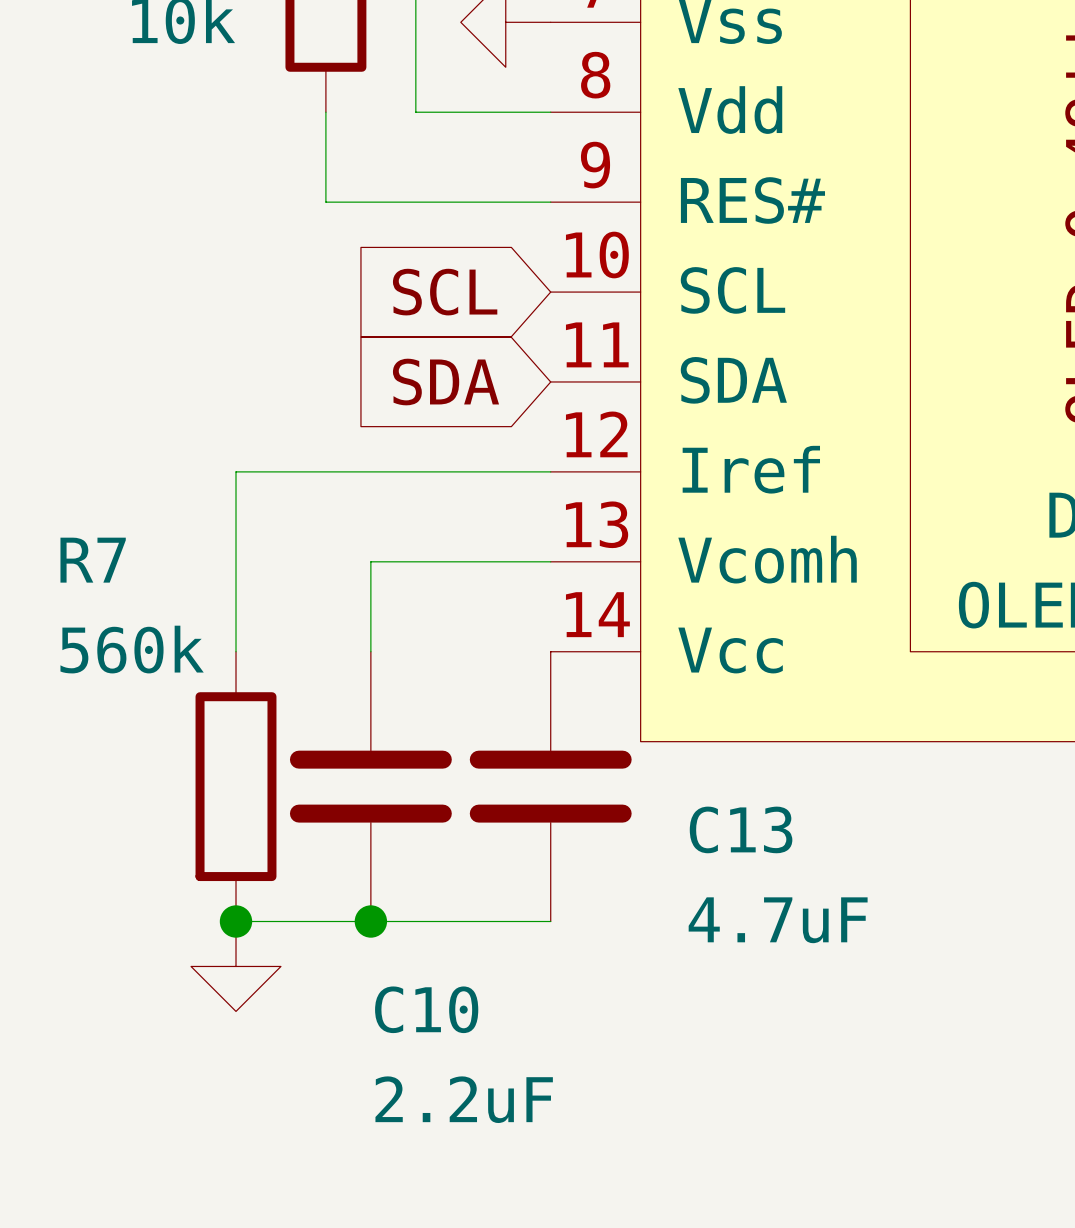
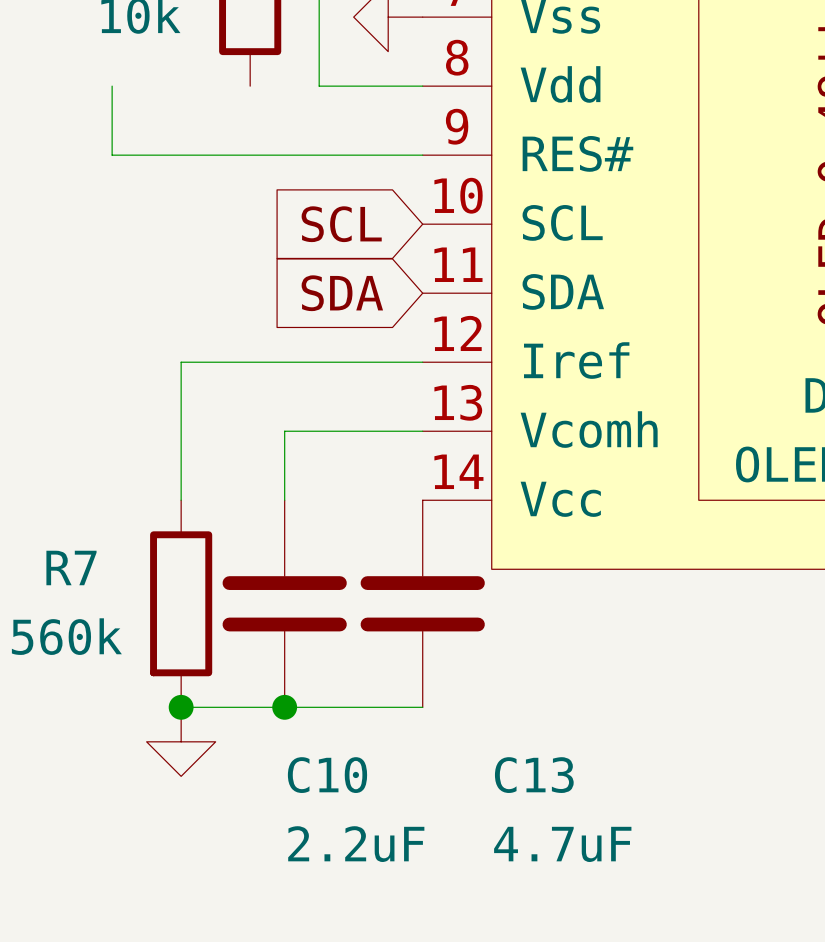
wire: (325, 112) (325, 202) -> (112, 86) (112, 155) (250, 155)
R7 name position: R7 (93, 560) -> R7 (71, 567)
R7 value position: 560k (132, 649) -> 560k (66, 636)
C13 name position: C13 (741, 829) -> C13 (534, 775)
C13 value position: 4.7uF (778, 920) -> 4.7uF (562, 844)

